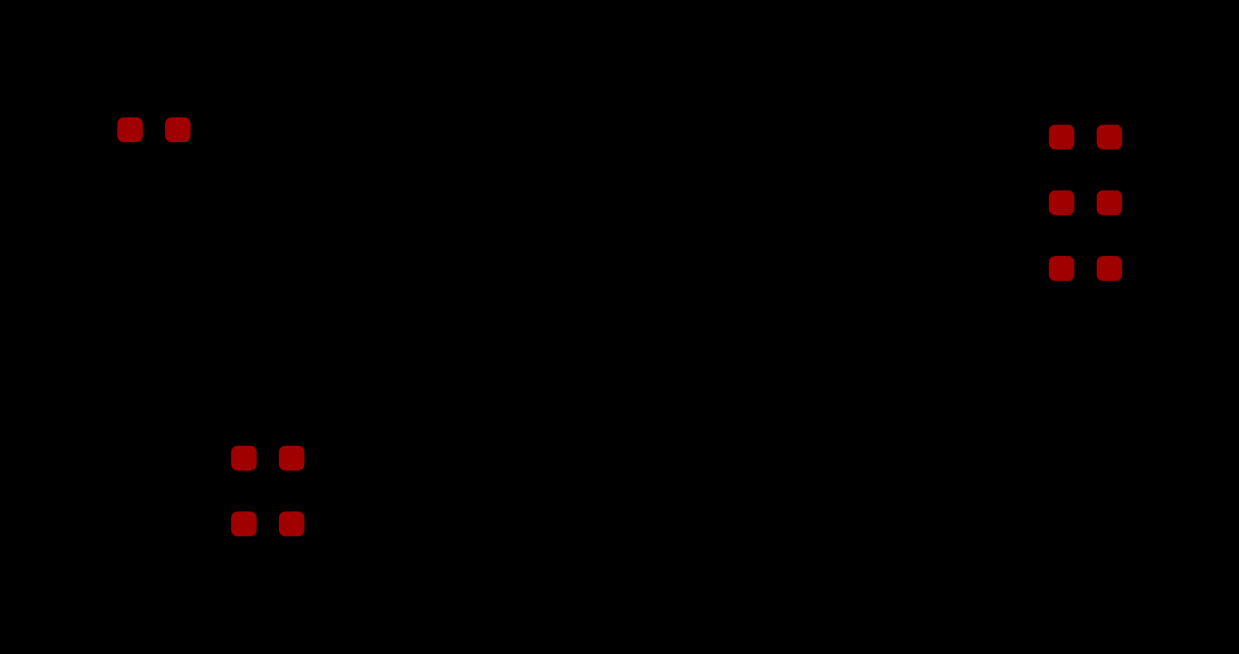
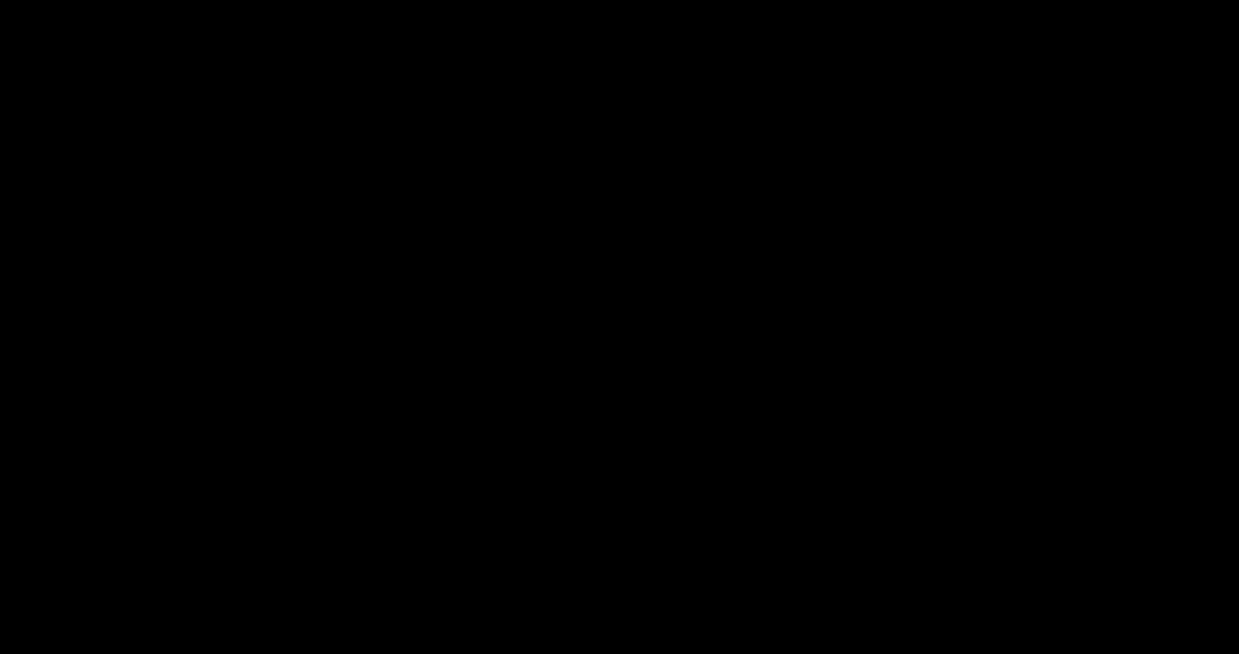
part: (153, 129) -> none
part: (1085, 137) -> none
part: (1085, 202) -> none
part: (1085, 268) -> none
part: (267, 458) -> none
part: (267, 523) -> none

